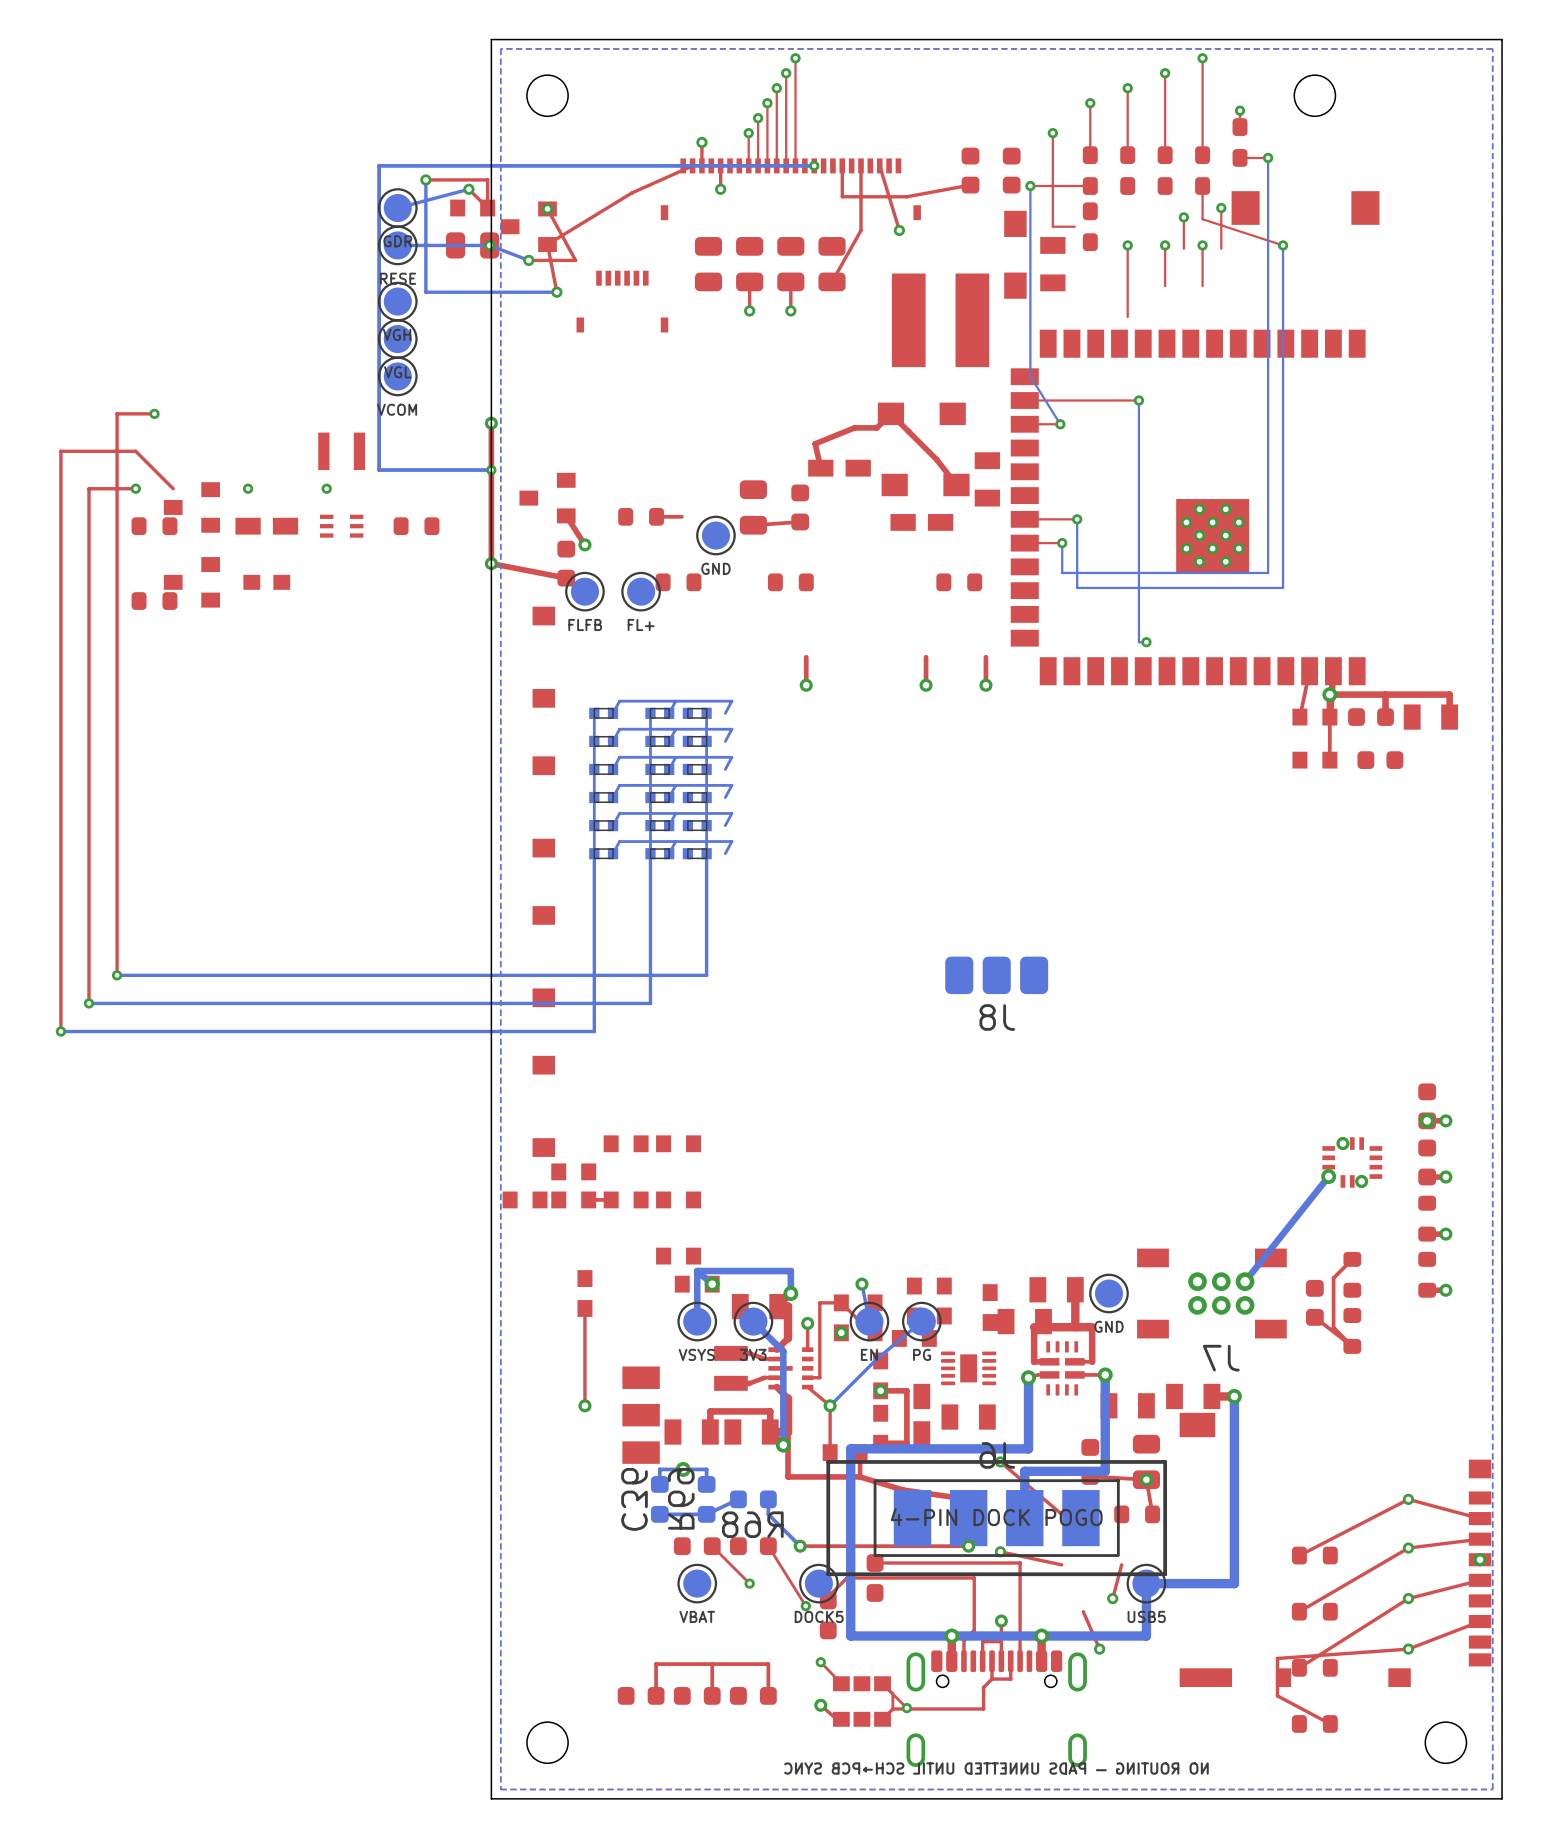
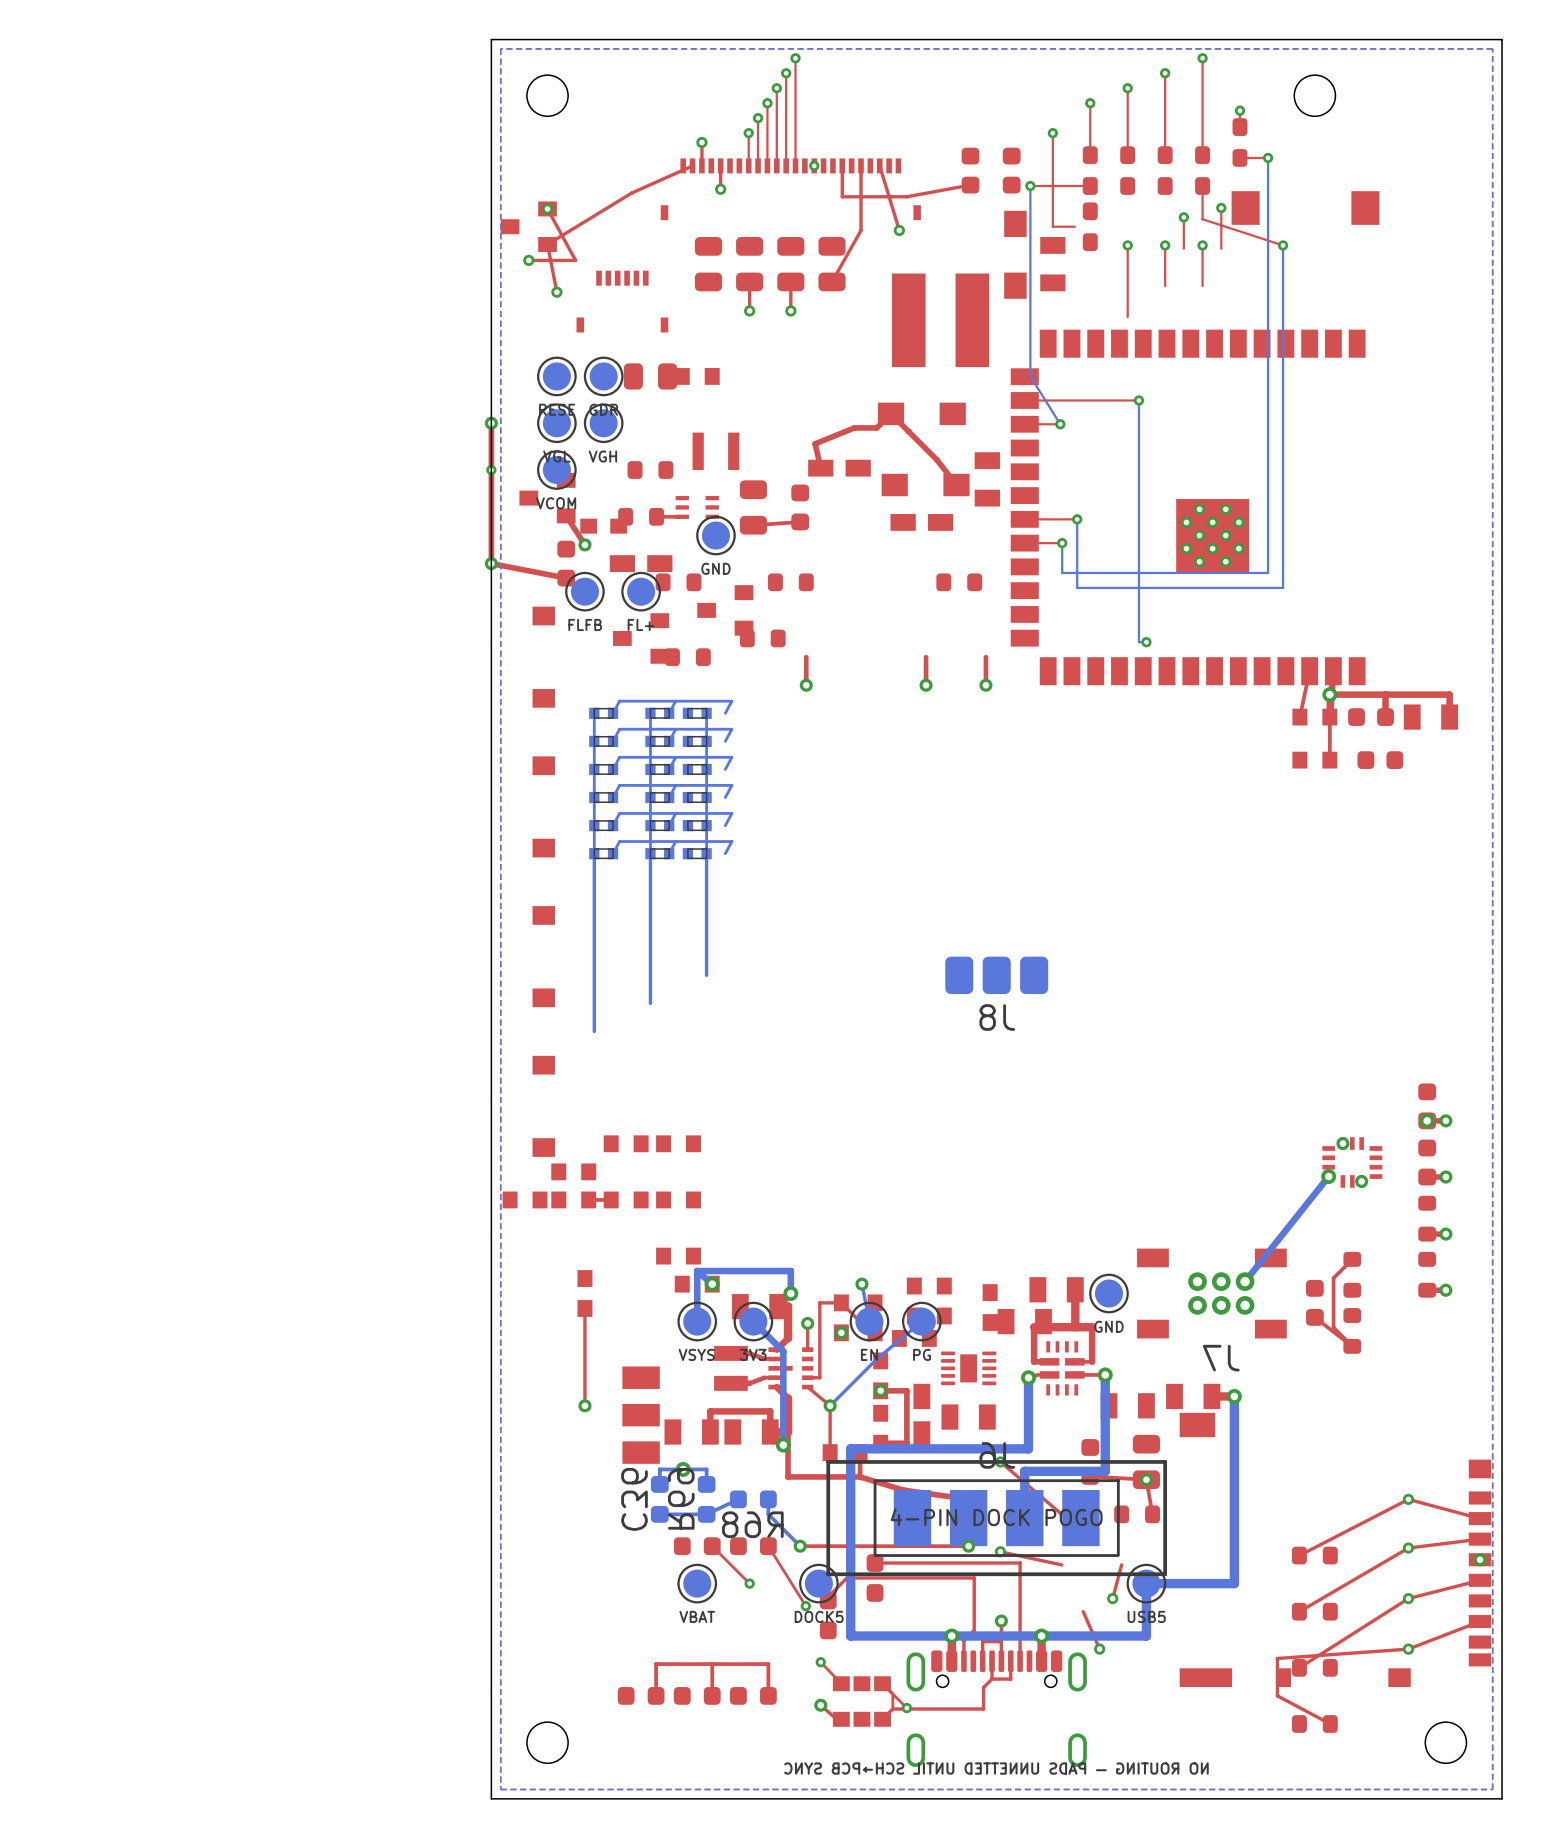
bottom track: (814, 165) (379, 165) (379, 470) (491, 470) -> none
top track: (425, 179) (487, 179) (487, 208) (468, 189) -> none
bottom track: (425, 179) (425, 292) (556, 292) -> none
via: (425, 179) -> none
bottom track: (468, 189) (397, 208) -> none
via: (468, 189) -> none
part position: (397, 208) -> (603, 376)
part position: (472, 208) -> (697, 376)
bottom track: (397, 245) (489, 245) (528, 260) -> none
part position: (397, 245) -> (556, 376)
part position: (472, 245) -> (650, 376)
via: (489, 245) -> none
part position: (397, 301) -> (603, 423)
part position: (397, 339) -> (556, 423)
part position: (397, 376) -> (556, 470)
top track: (154, 413) (117, 413) (117, 975) -> none
via: (154, 413) -> none
part position: (341, 451) -> (715, 451)
part: none -> (650, 470)
top track: (135, 488) (88, 488) (88, 1003) -> none
via: (135, 488) -> none
top track: (173, 488) (135, 451) (60, 451) (60, 1031) -> none
via: (248, 488) -> none
via: (326, 488) -> none
part: (191, 507) -> none
part: (154, 526) -> none
part position: (266, 526) -> (641, 563)
part position: (341, 526) -> (697, 507)
part: (416, 526) -> none
part: (191, 582) -> none
part position: (266, 582) -> (603, 526)
part: (154, 601) -> none
part: none -> (725, 610)
part: none -> (641, 638)
part: none -> (762, 638)
part: none -> (687, 657)
via: (117, 975) -> none
bottom track: (706, 975) (117, 975) -> none
via: (88, 1003) -> none
bottom track: (650, 1003) (88, 1003) -> none
via: (60, 1031) -> none
bottom track: (594, 1031) (60, 1031) -> none

